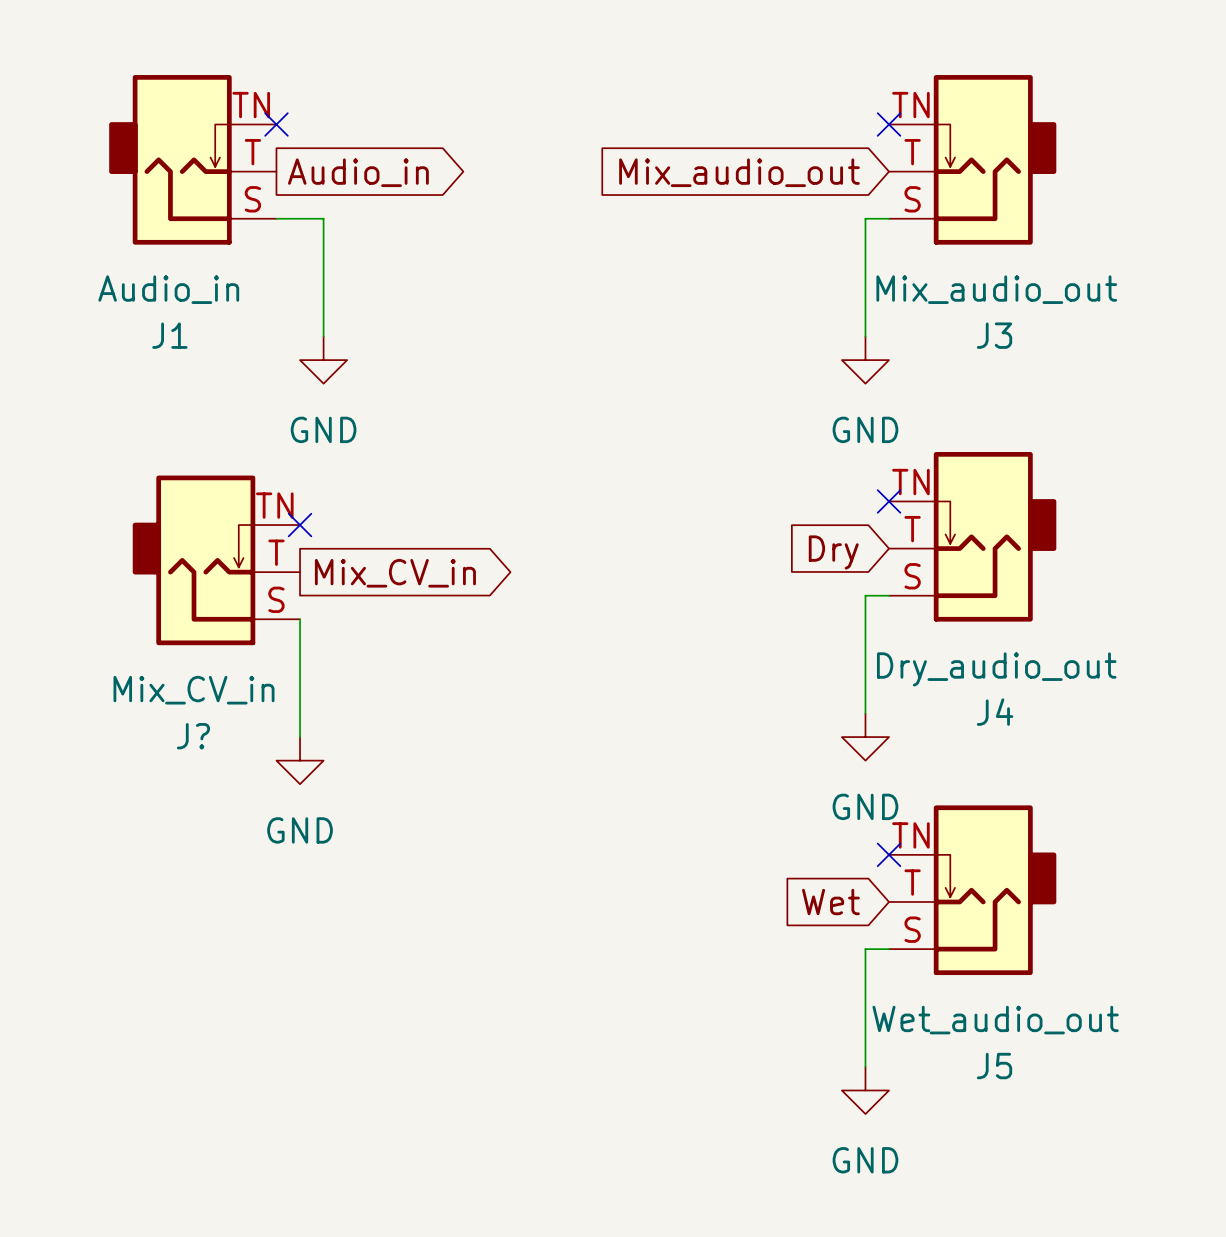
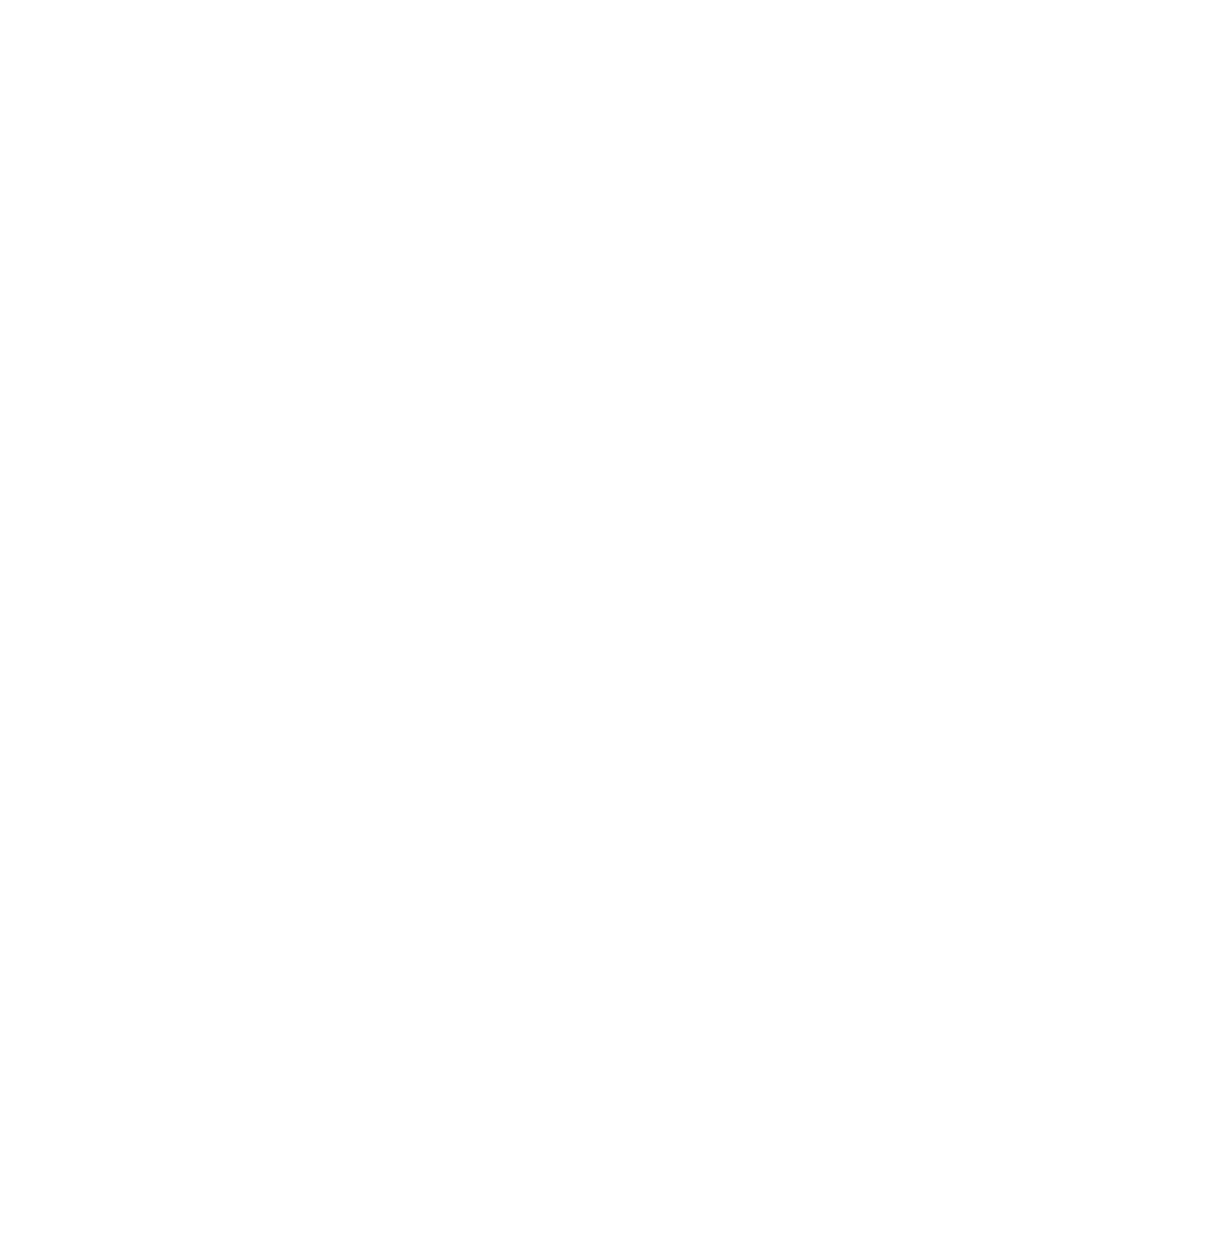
no-connect mark: (276, 124) -> none
no-connect mark: (889, 124) -> none
J1: Audio_in (192, 159) -> none
J3: Mix_audio_out (972, 159) -> none
global label: Audio_in (358, 172) -> none
global label: Mix_audio_out (739, 172) -> none
wire: (276, 218) (323, 218) (323, 336) -> none
wire: (889, 218) (865, 218) (865, 336) -> none
power symbol: GND (323, 360) -> none
power symbol: GND (865, 360) -> none
no-connect mark: (889, 501) -> none
no-connect mark: (300, 525) -> none
J4: Dry_audio_out (972, 536) -> none
global label: Dry (833, 552) -> none
J?: Mix_CV_in (216, 560) -> none
global label: Mix_CV_in (395, 573) -> none
wire: (889, 595) (865, 595) (865, 713) -> none
wire: (300, 619) (300, 737) -> none
power symbol: GND (865, 737) -> none
power symbol: GND (300, 760) -> none
no-connect mark: (889, 854) -> none
J5: Wet_audio_out (972, 890) -> none
global label: Wet (830, 901) -> none
wire: (889, 949) (865, 949) (865, 1066) -> none
power symbol: GND (865, 1090) -> none

